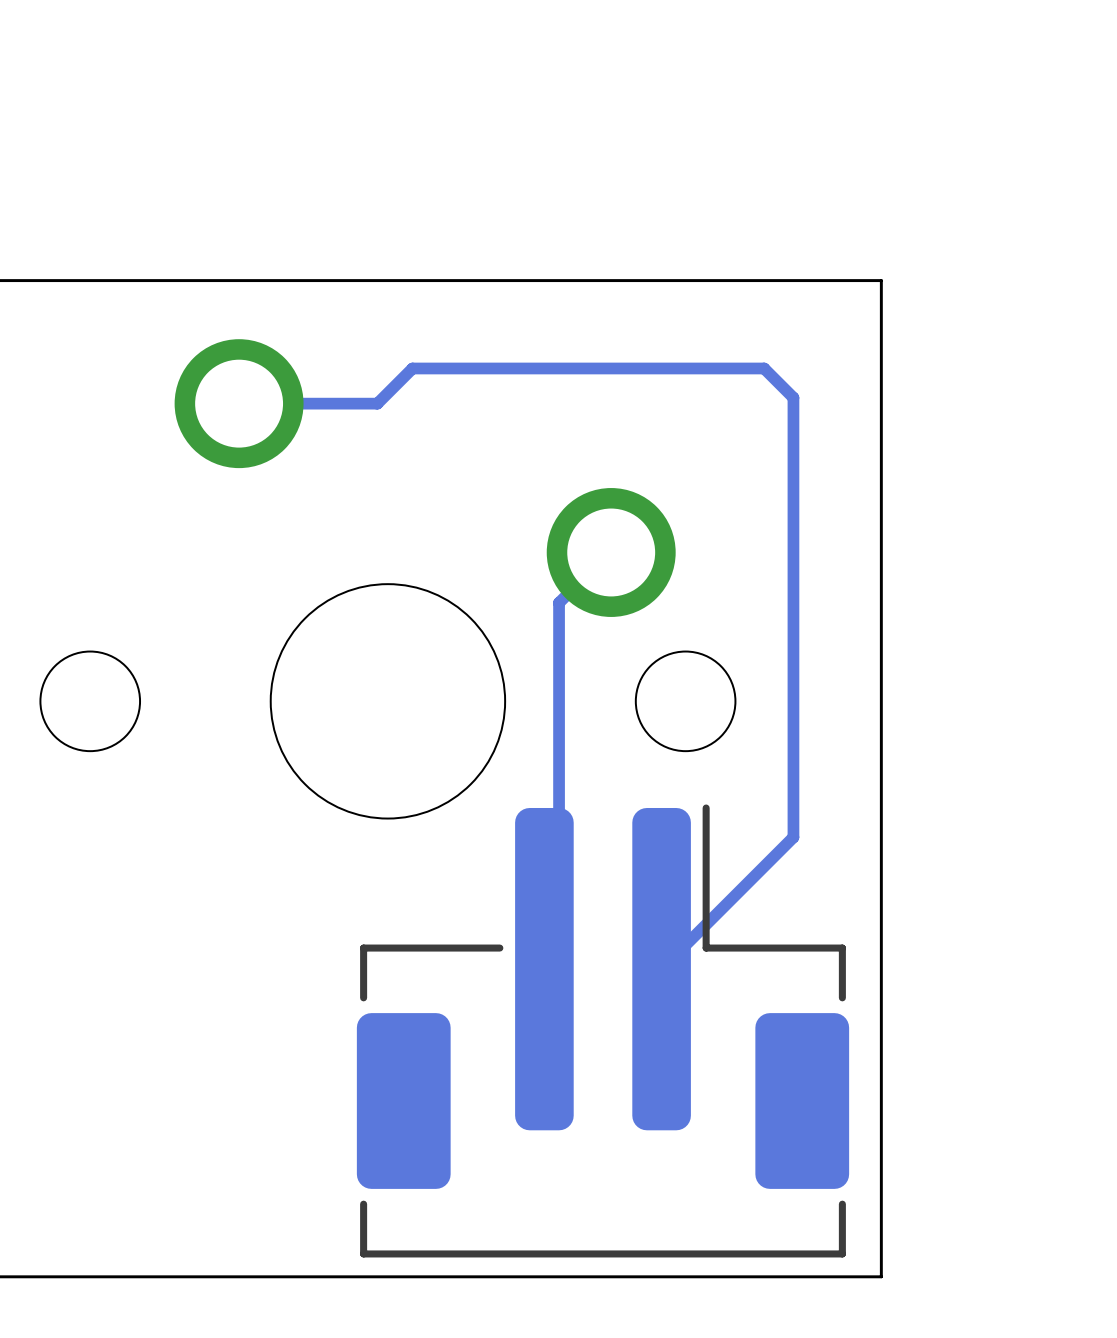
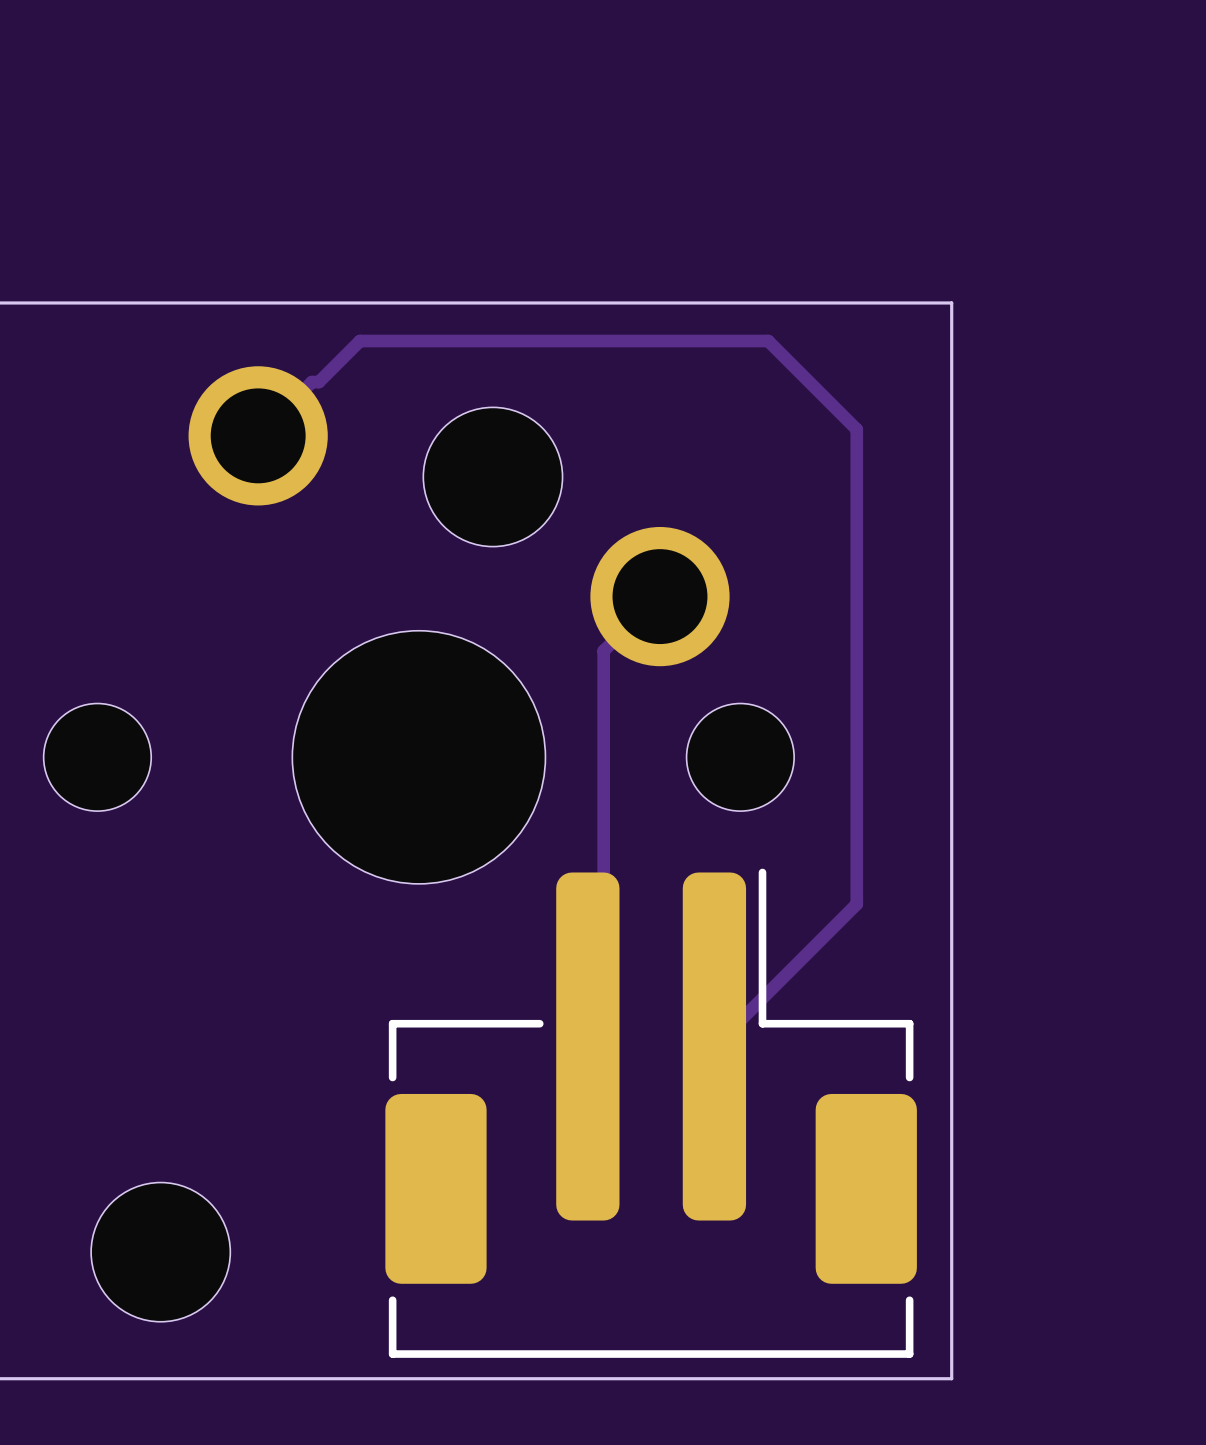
track: (764, 368) (412, 368) (377, 403) (239, 403) -> (825, 397) (768, 341) (359, 341) (318, 382) (311, 382) (258, 435)
part: none -> (492, 476)
part: none -> (160, 1252)

